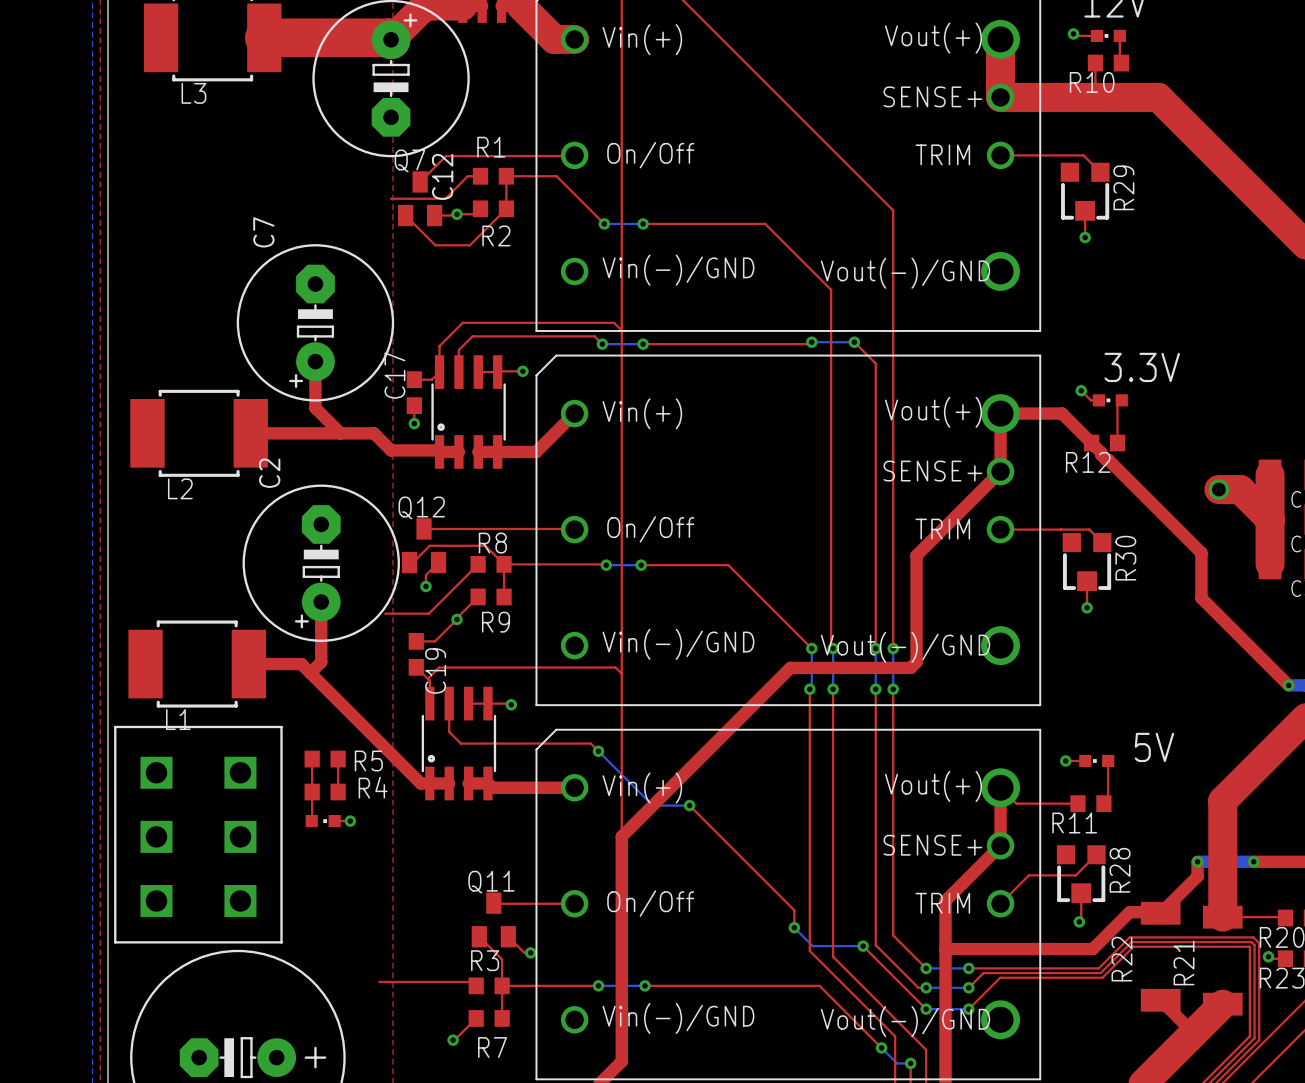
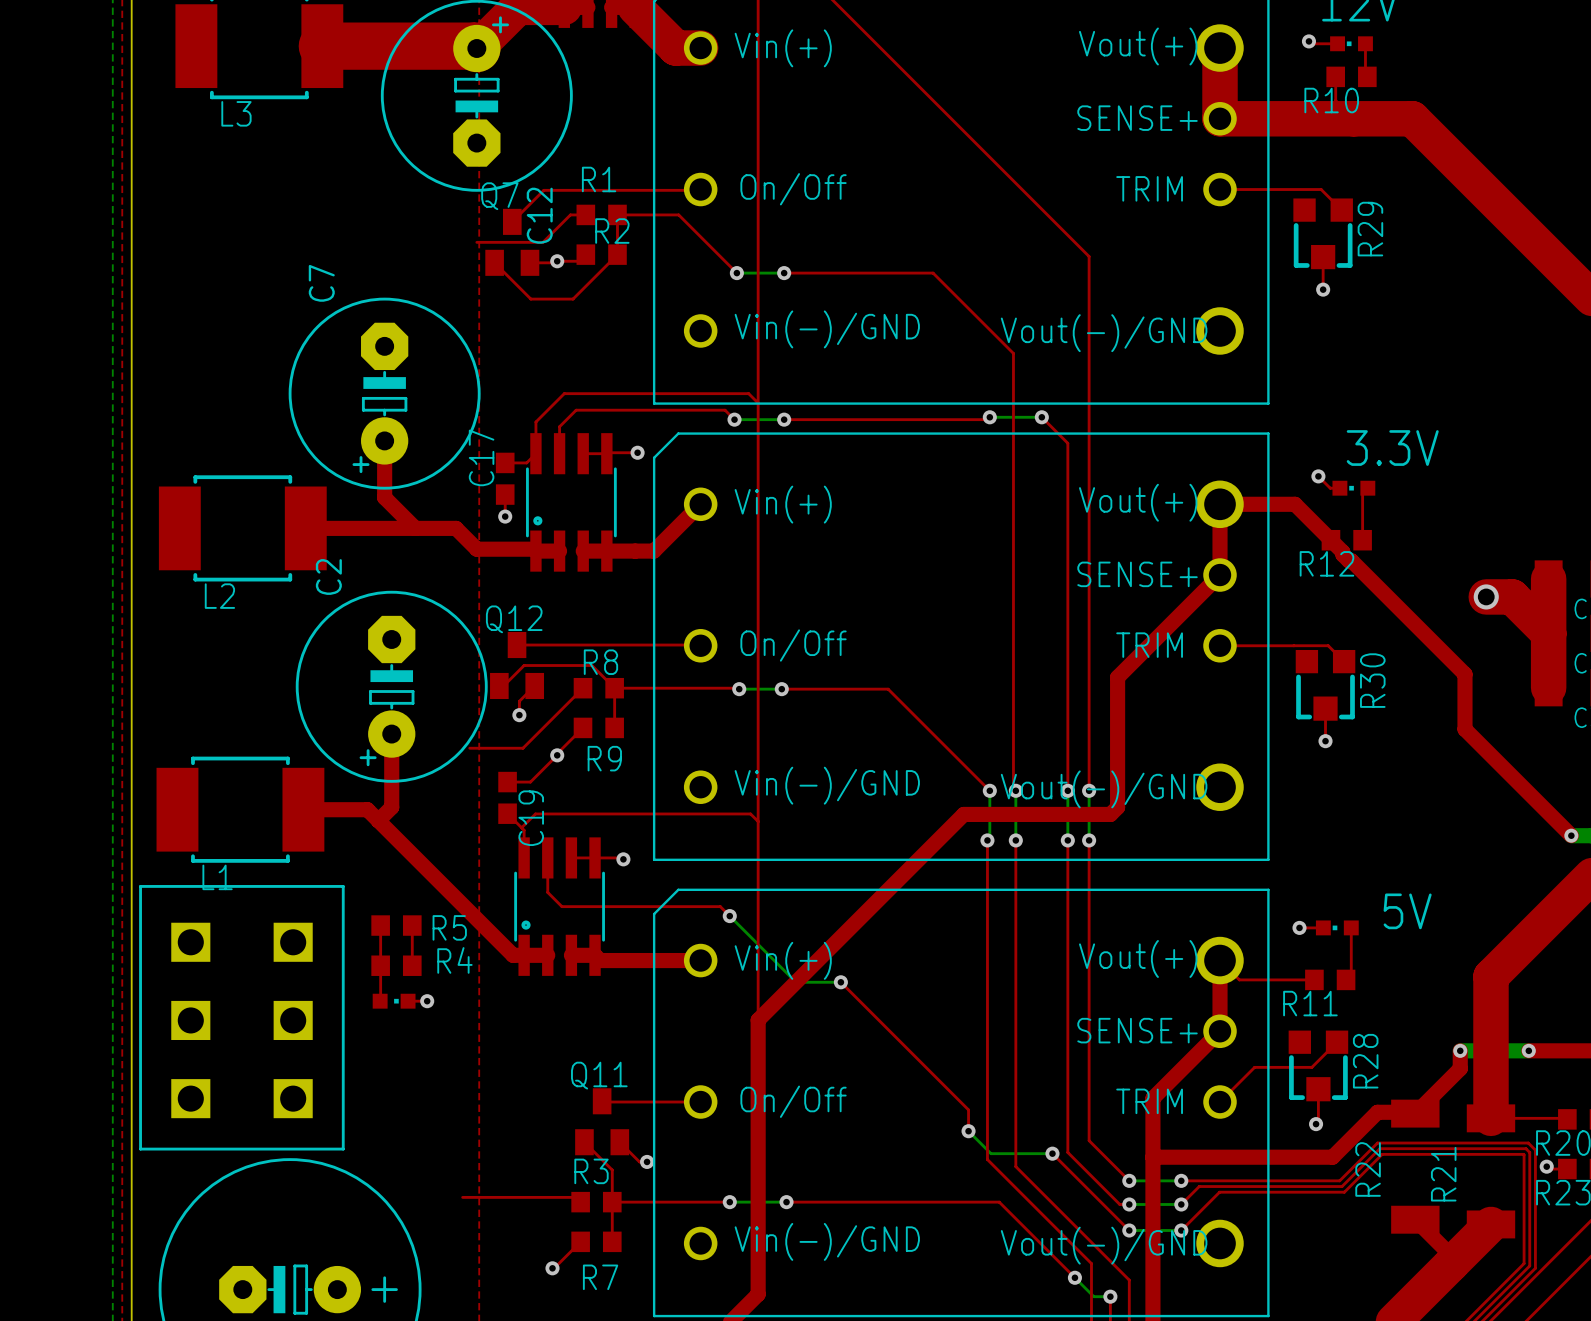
R2 name position: R2 (496, 235) -> R2 (612, 231)

